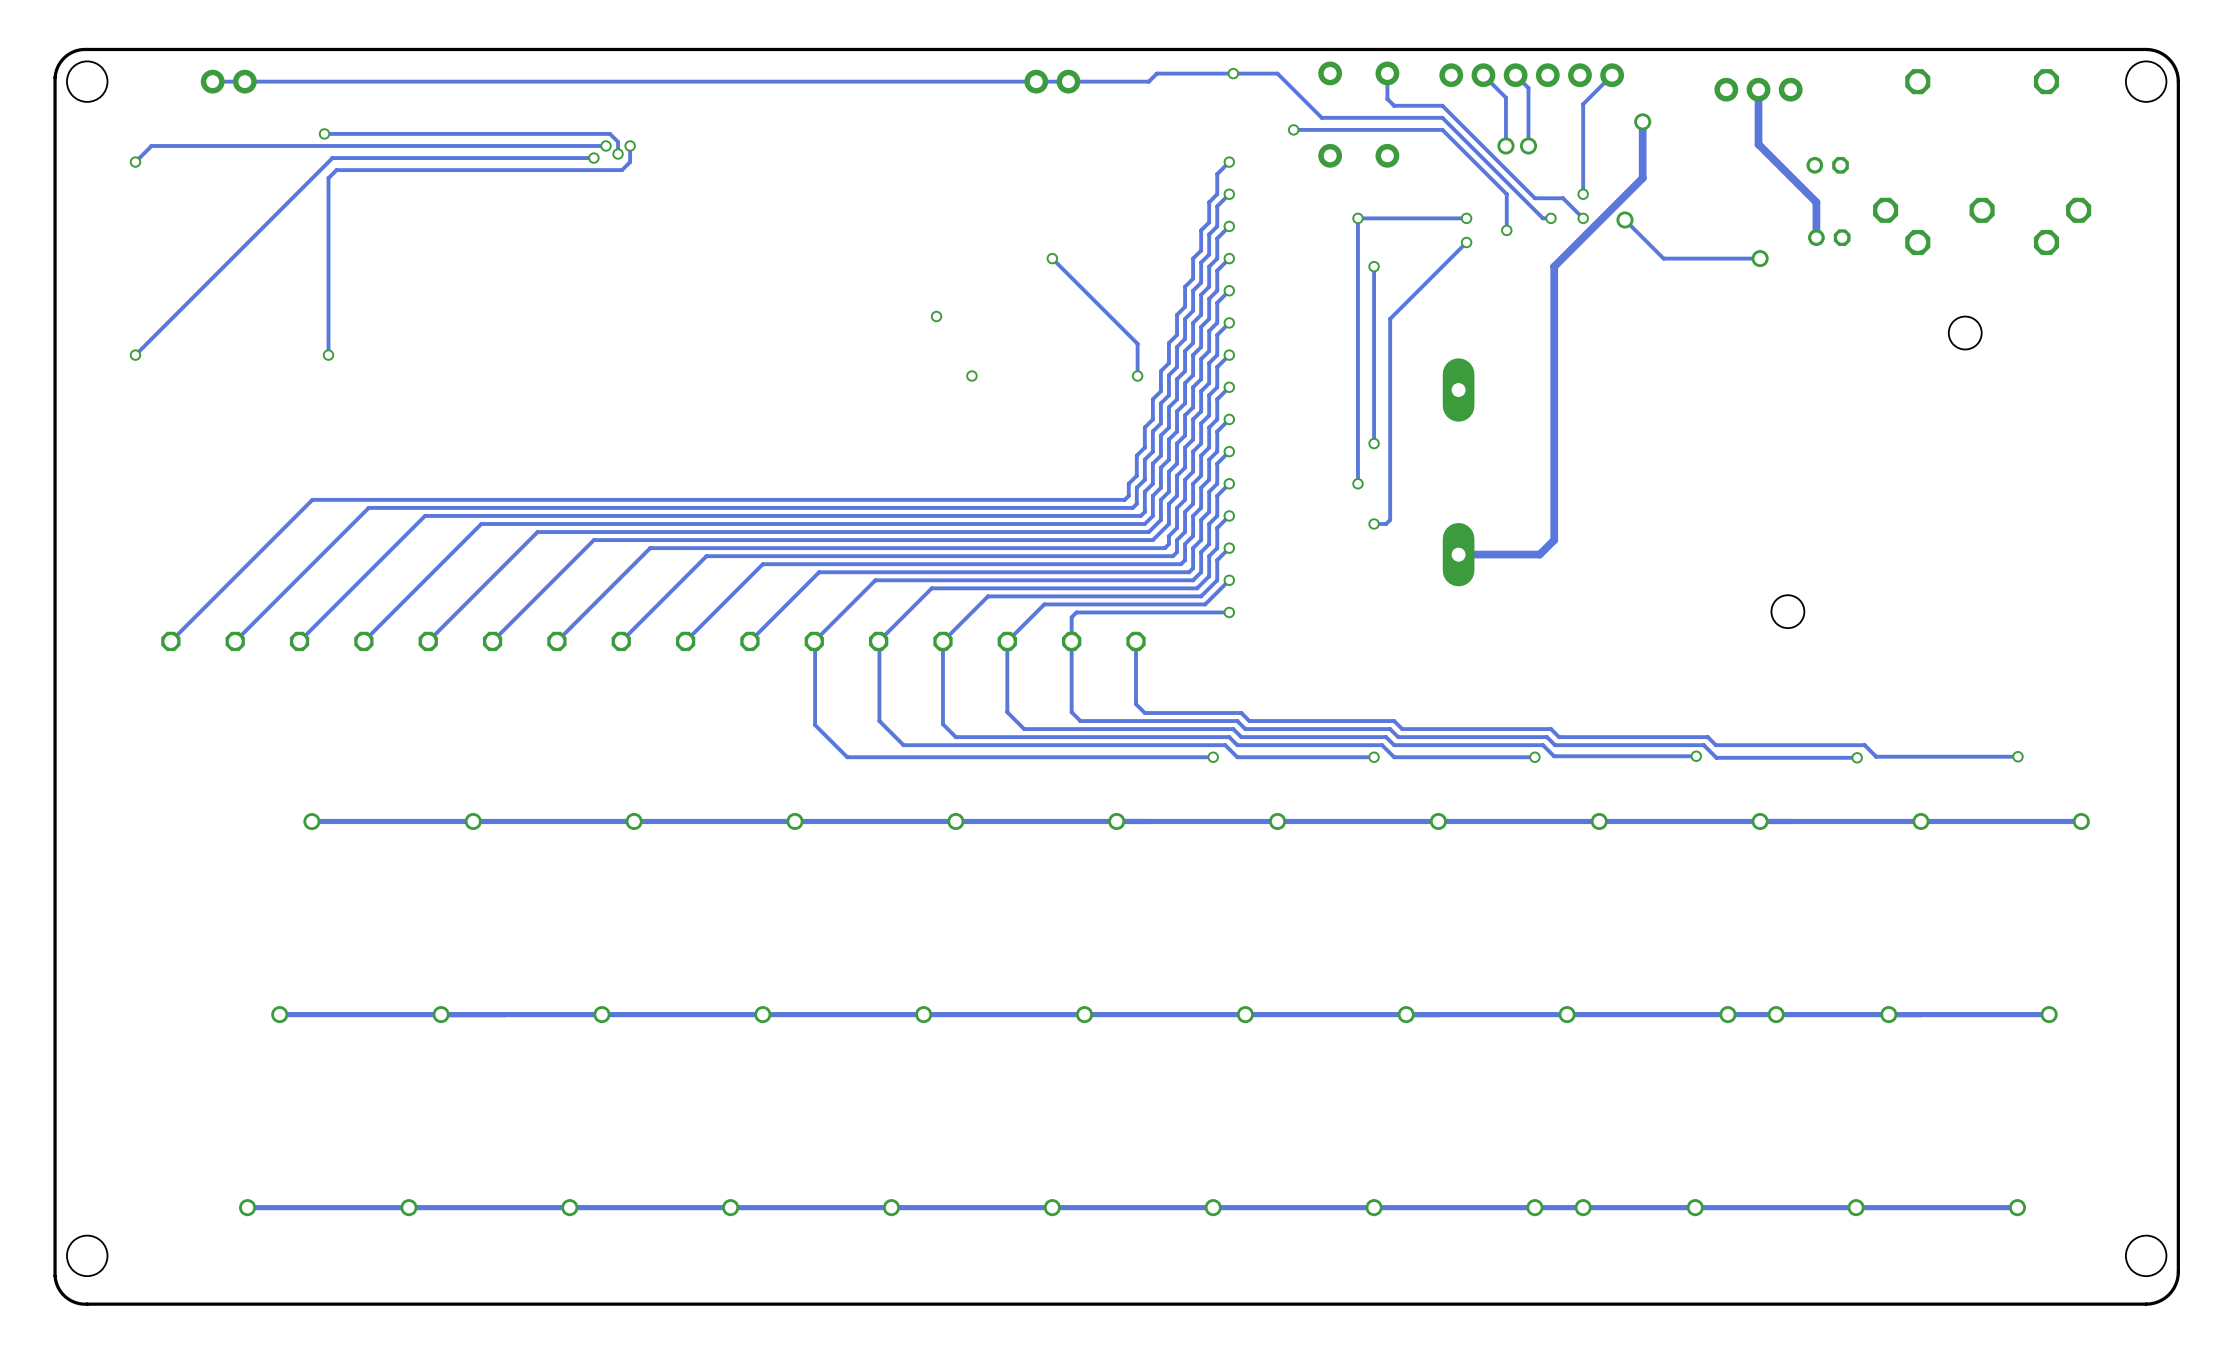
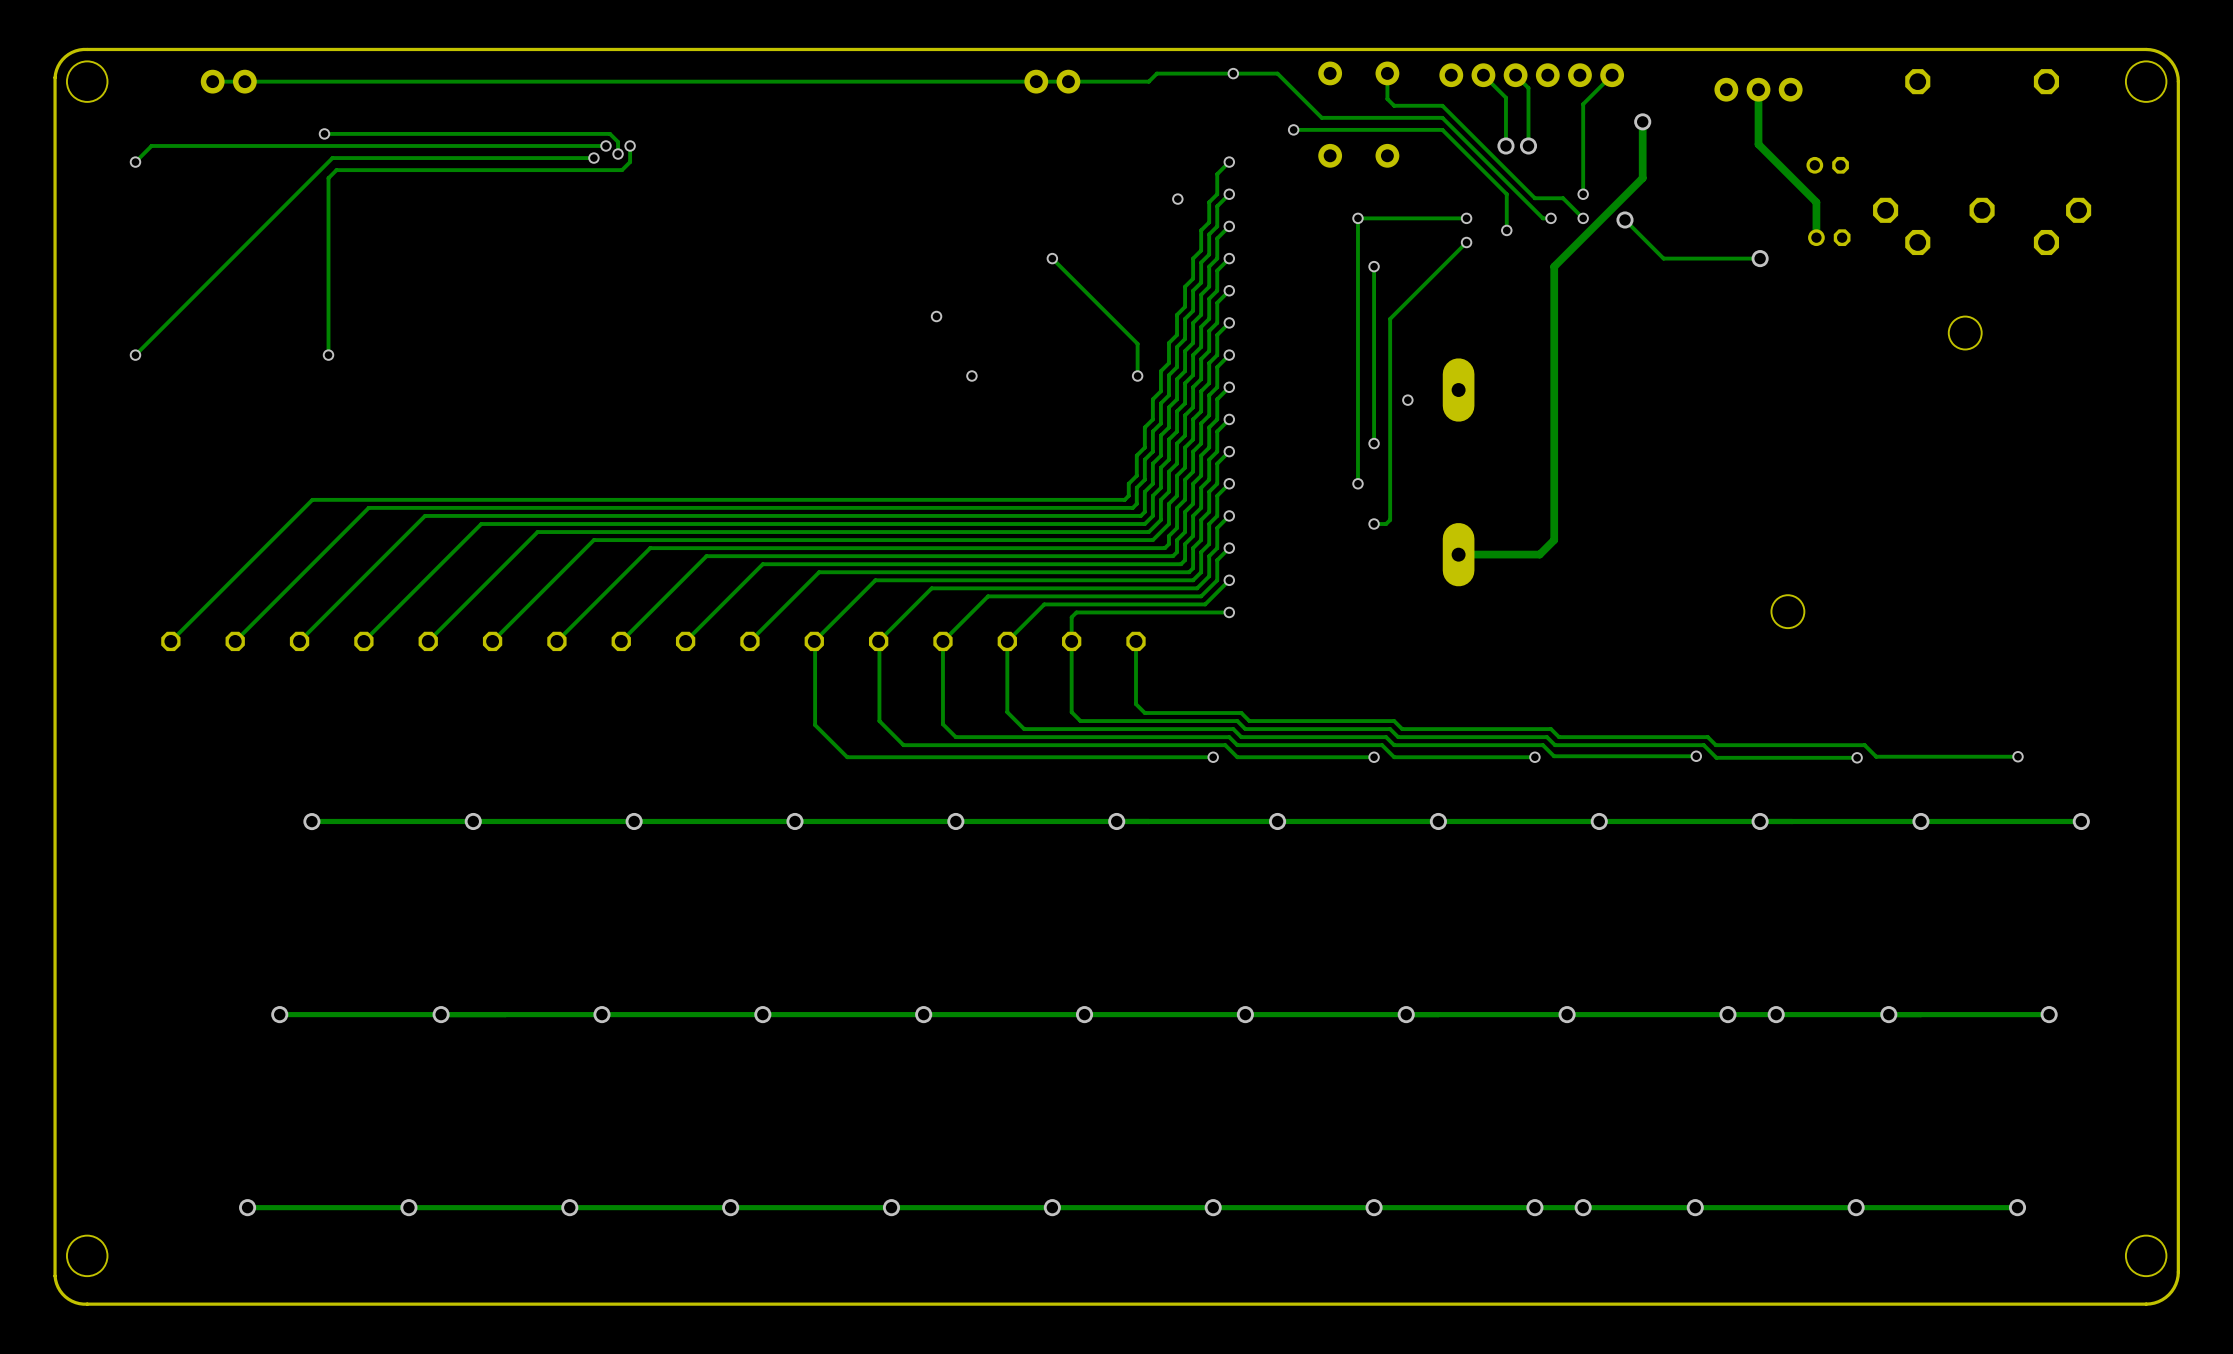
via: none -> (1177, 199)
via: none -> (1407, 400)

